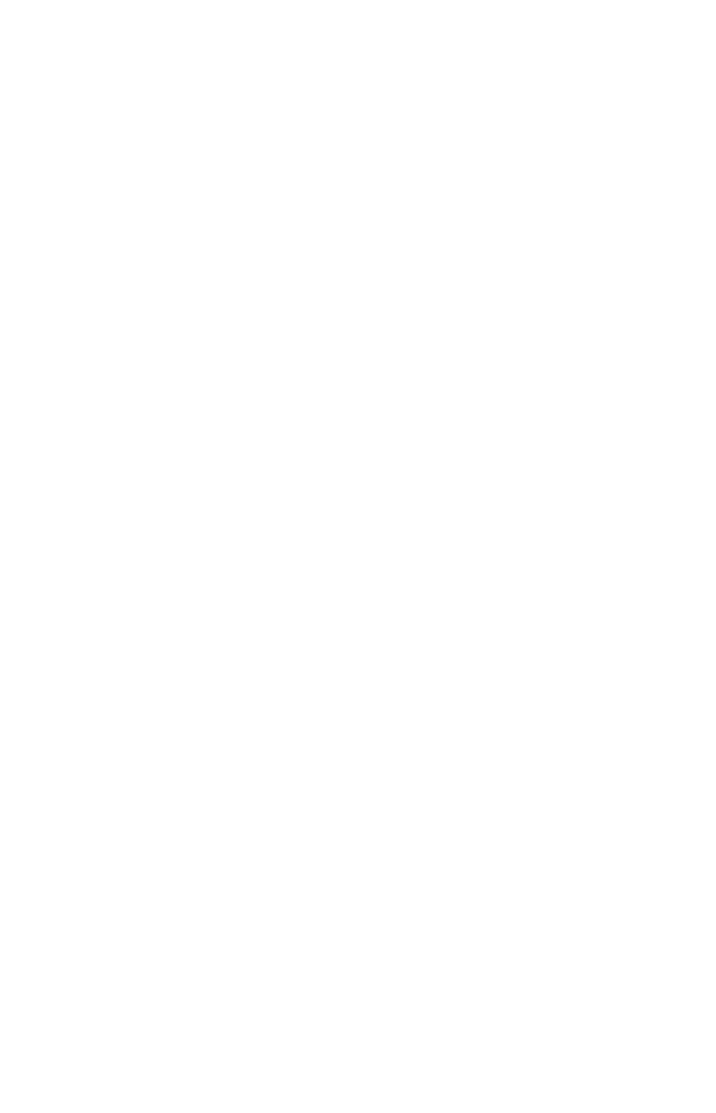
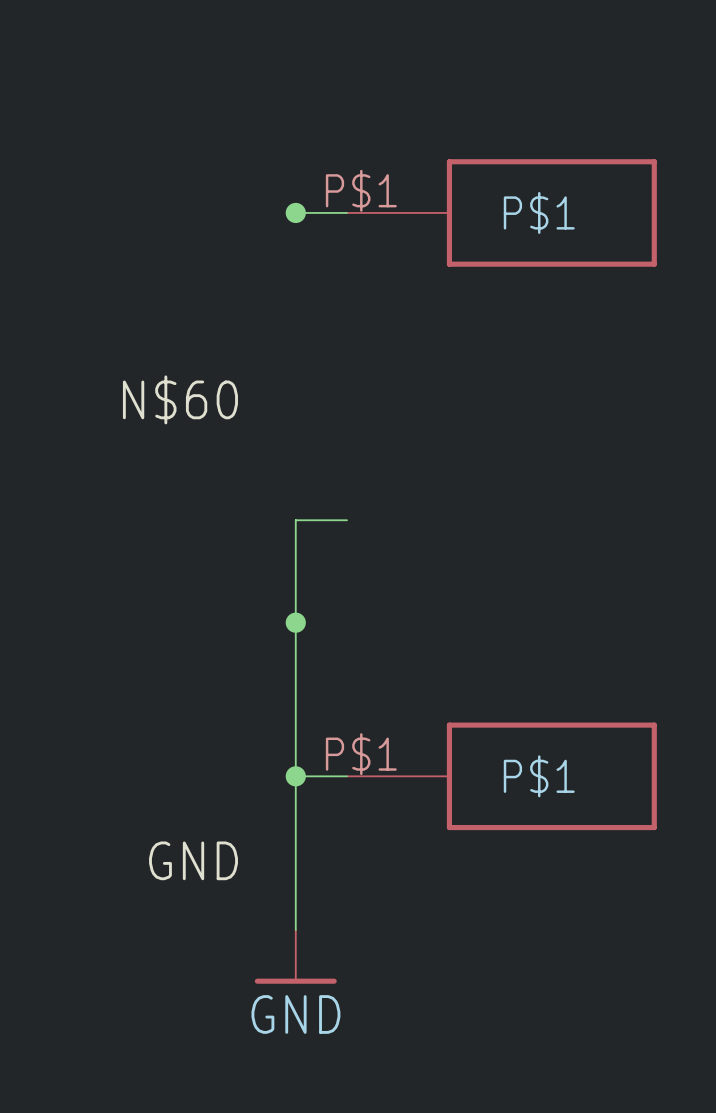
wire: none -> (295, 212) (346, 212)
junction: none -> (295, 212)
part: none -> (501, 212)
label: none -> N$60 (180, 399)
wire: none -> (346, 520) (295, 520) (295, 929)
junction: none -> (295, 622)
wire: none -> (295, 776) (346, 776)
junction: none -> (295, 776)
part: none -> (501, 776)
label: none -> GND (193, 860)
power symbol: none -> GND (295, 956)

